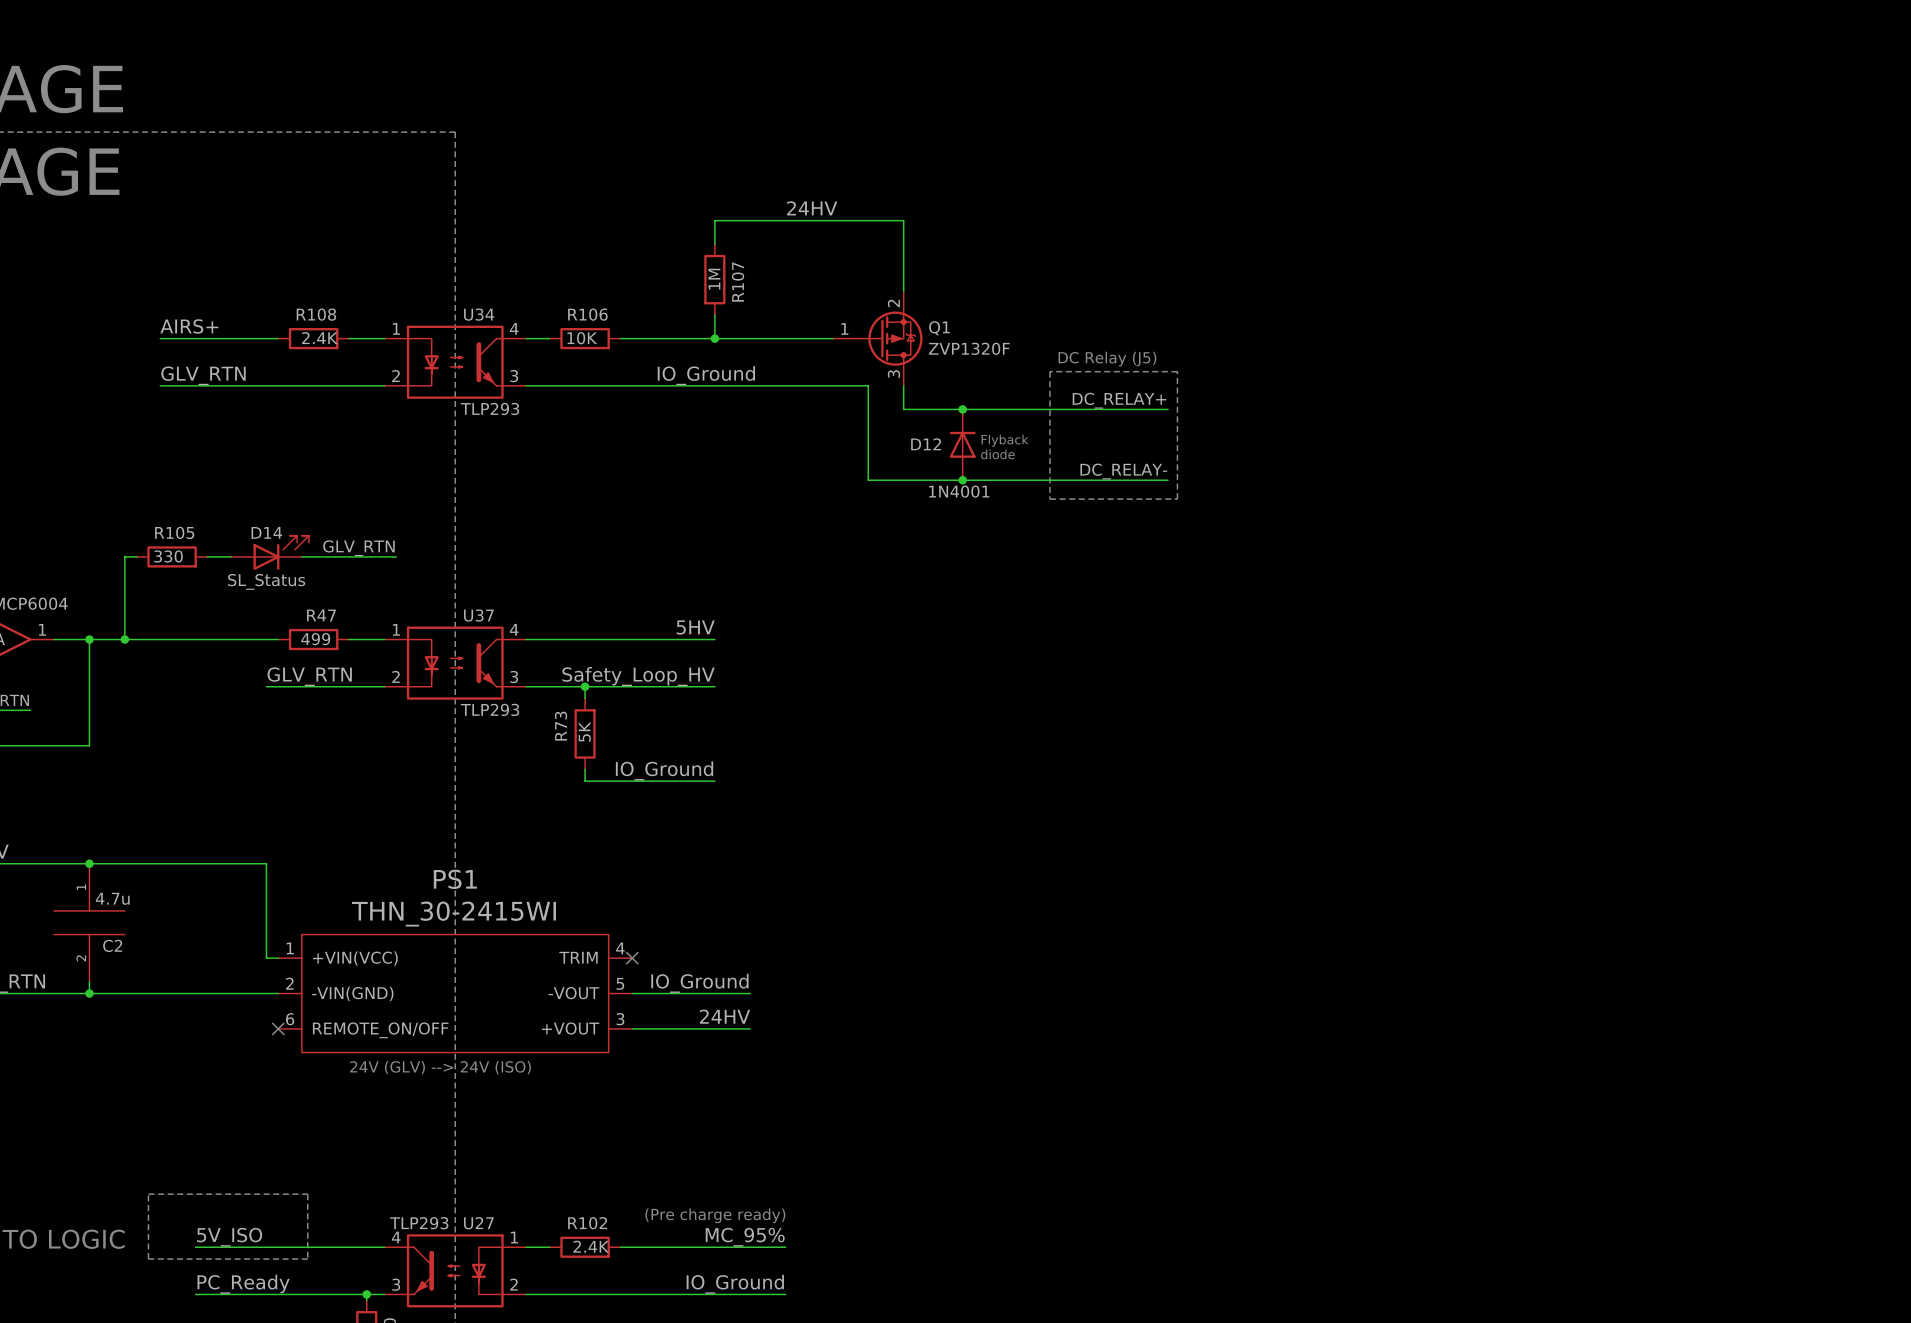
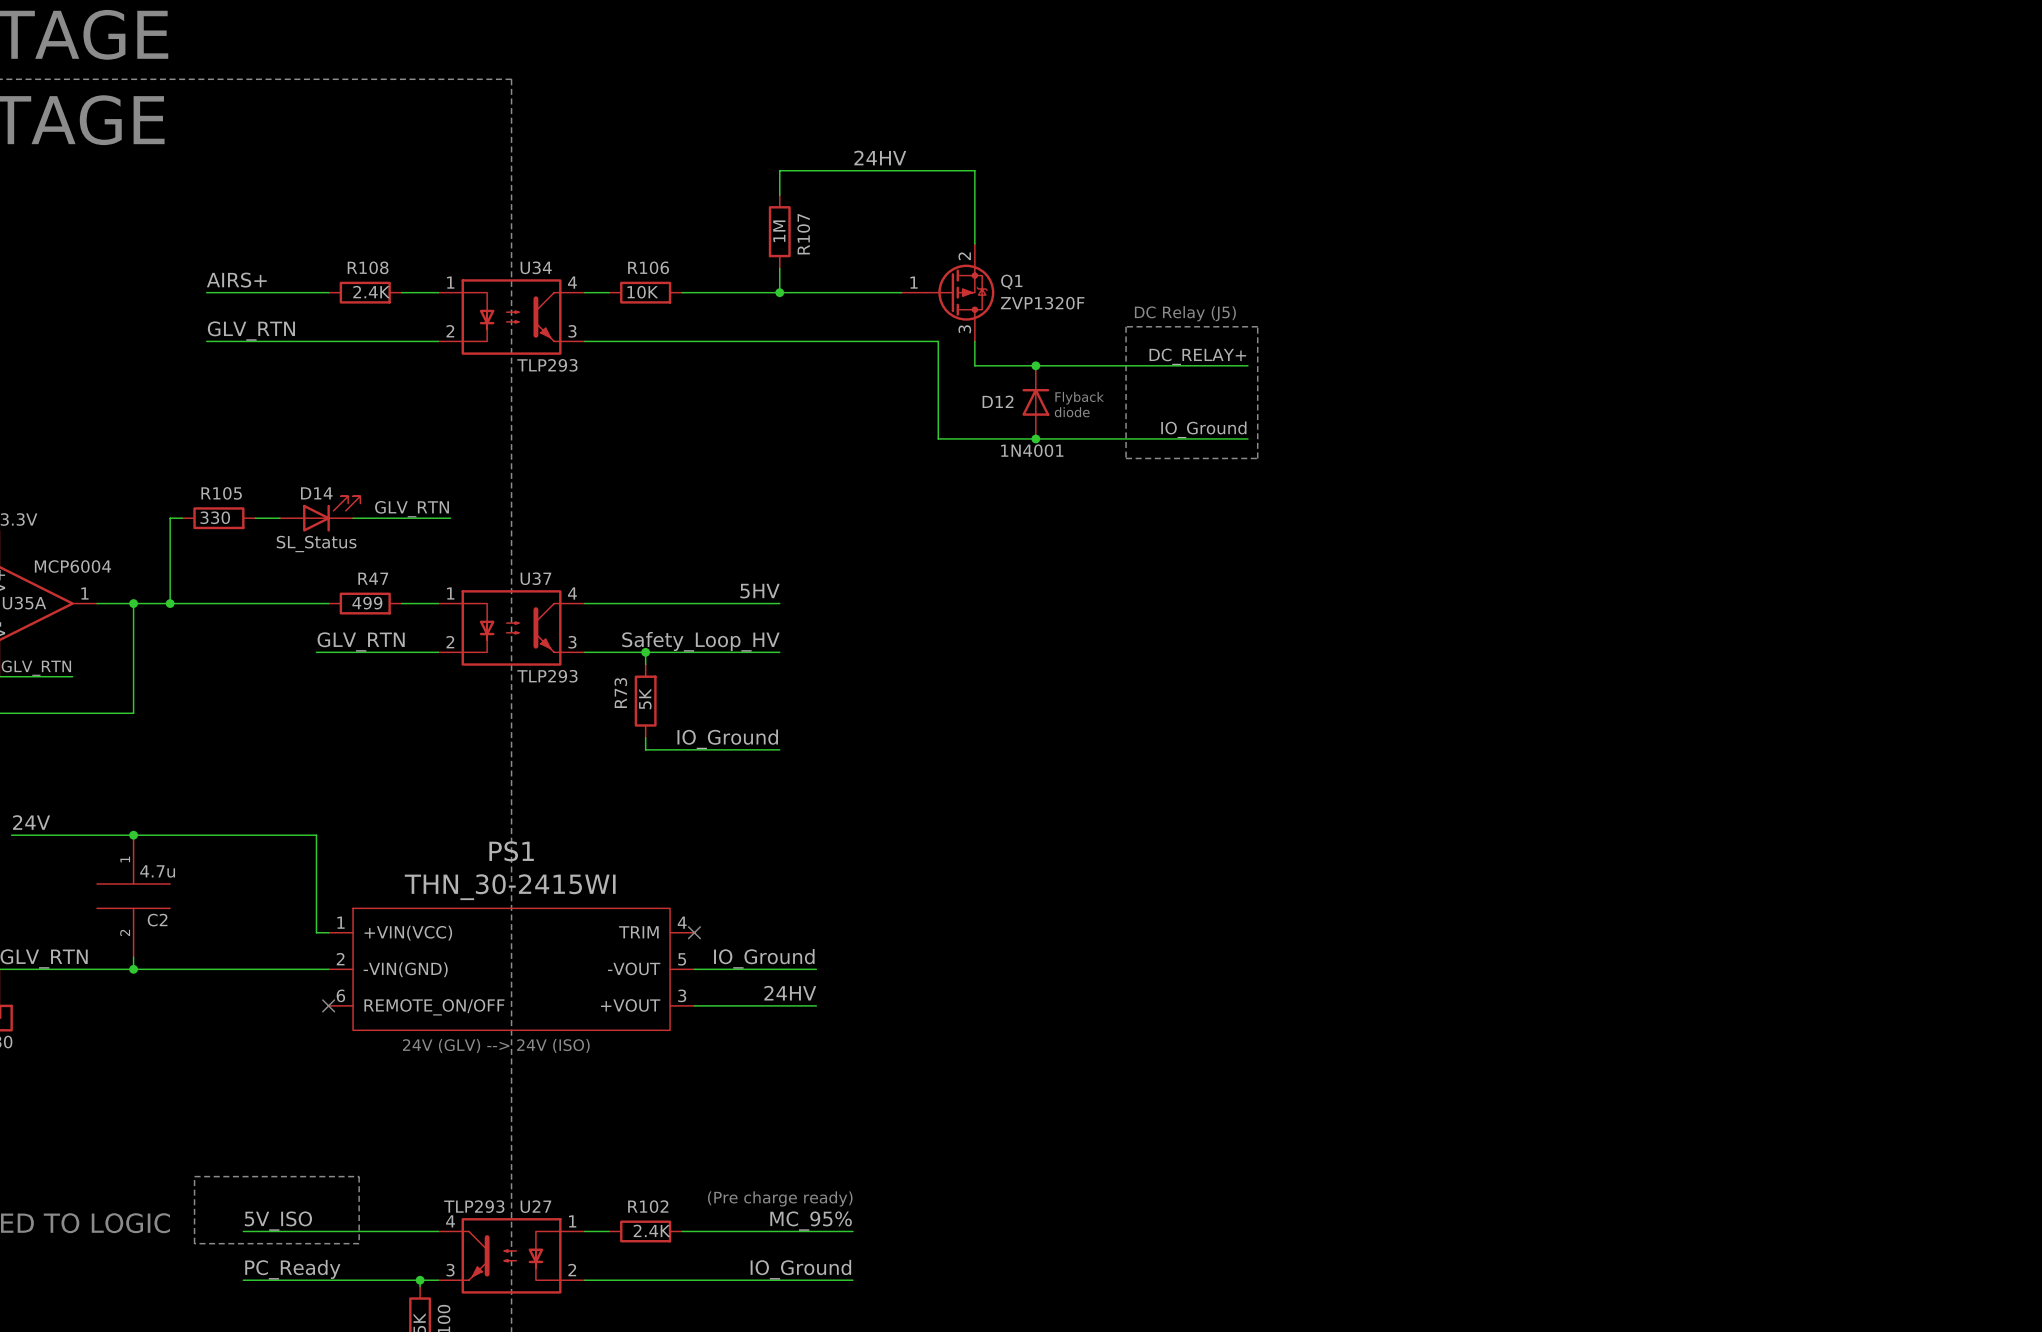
label: IO_Ground (706, 375) -> none
label: DC_RELAY- (1123, 471) -> IO_Ground (1203, 429)

